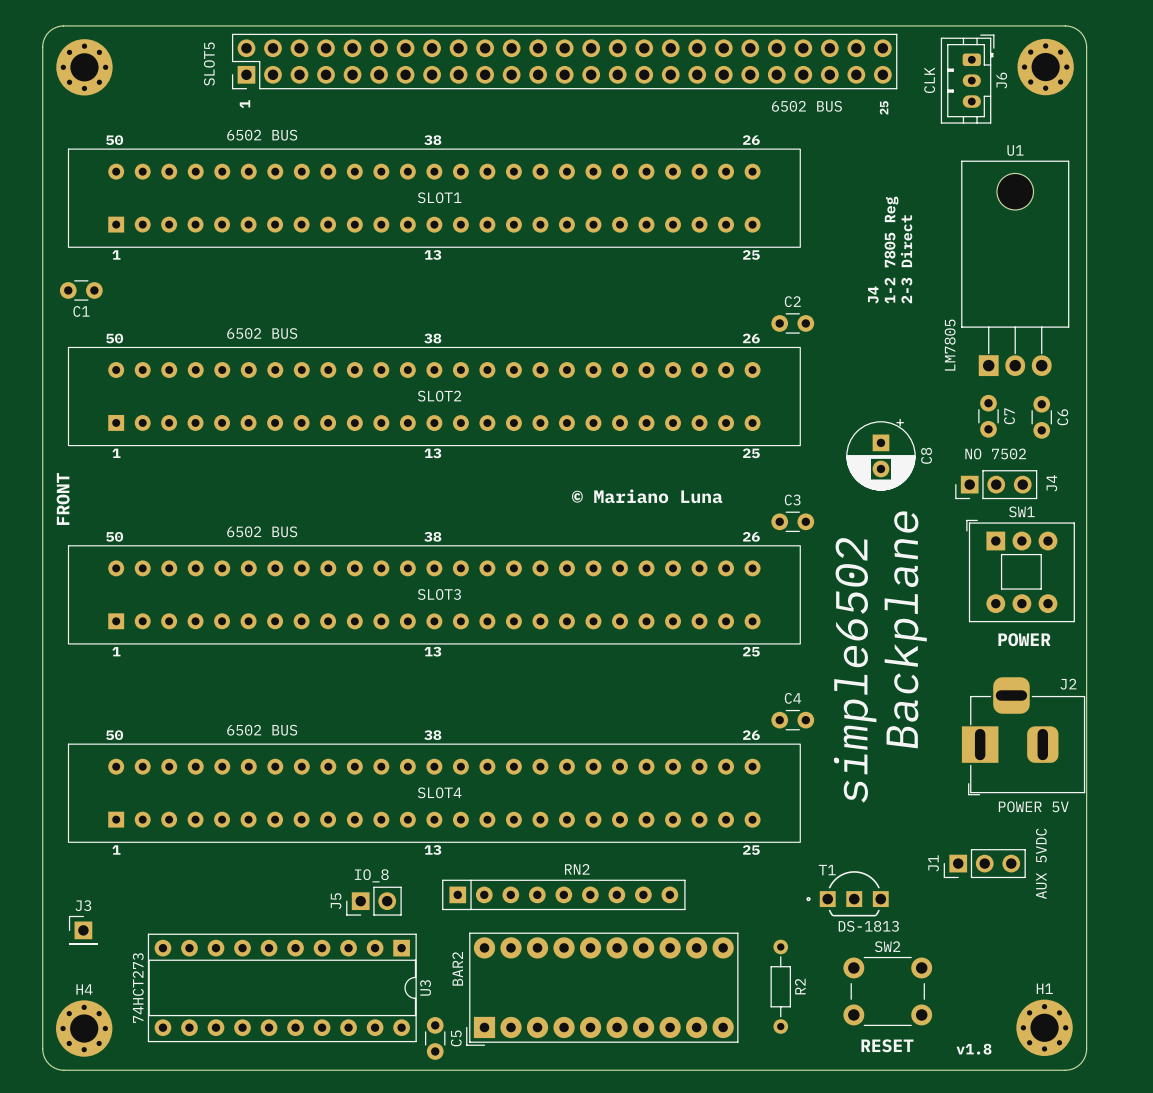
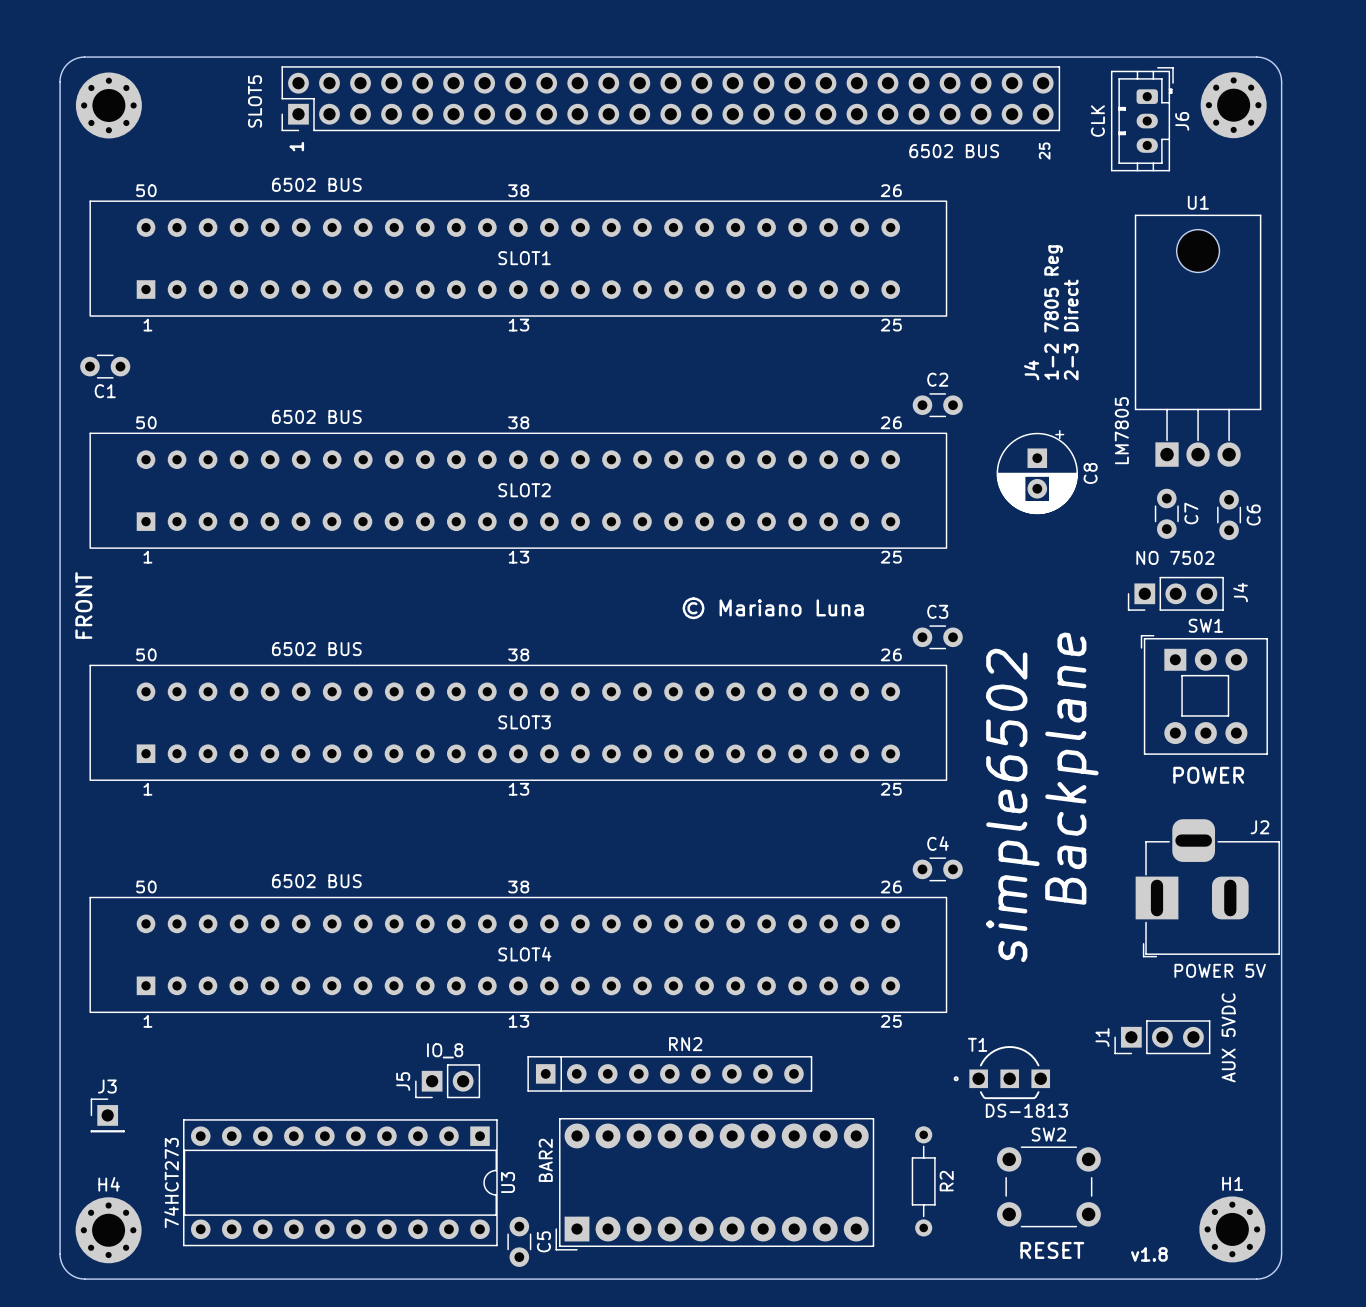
C8 position: (880, 454) -> (1037, 472)

